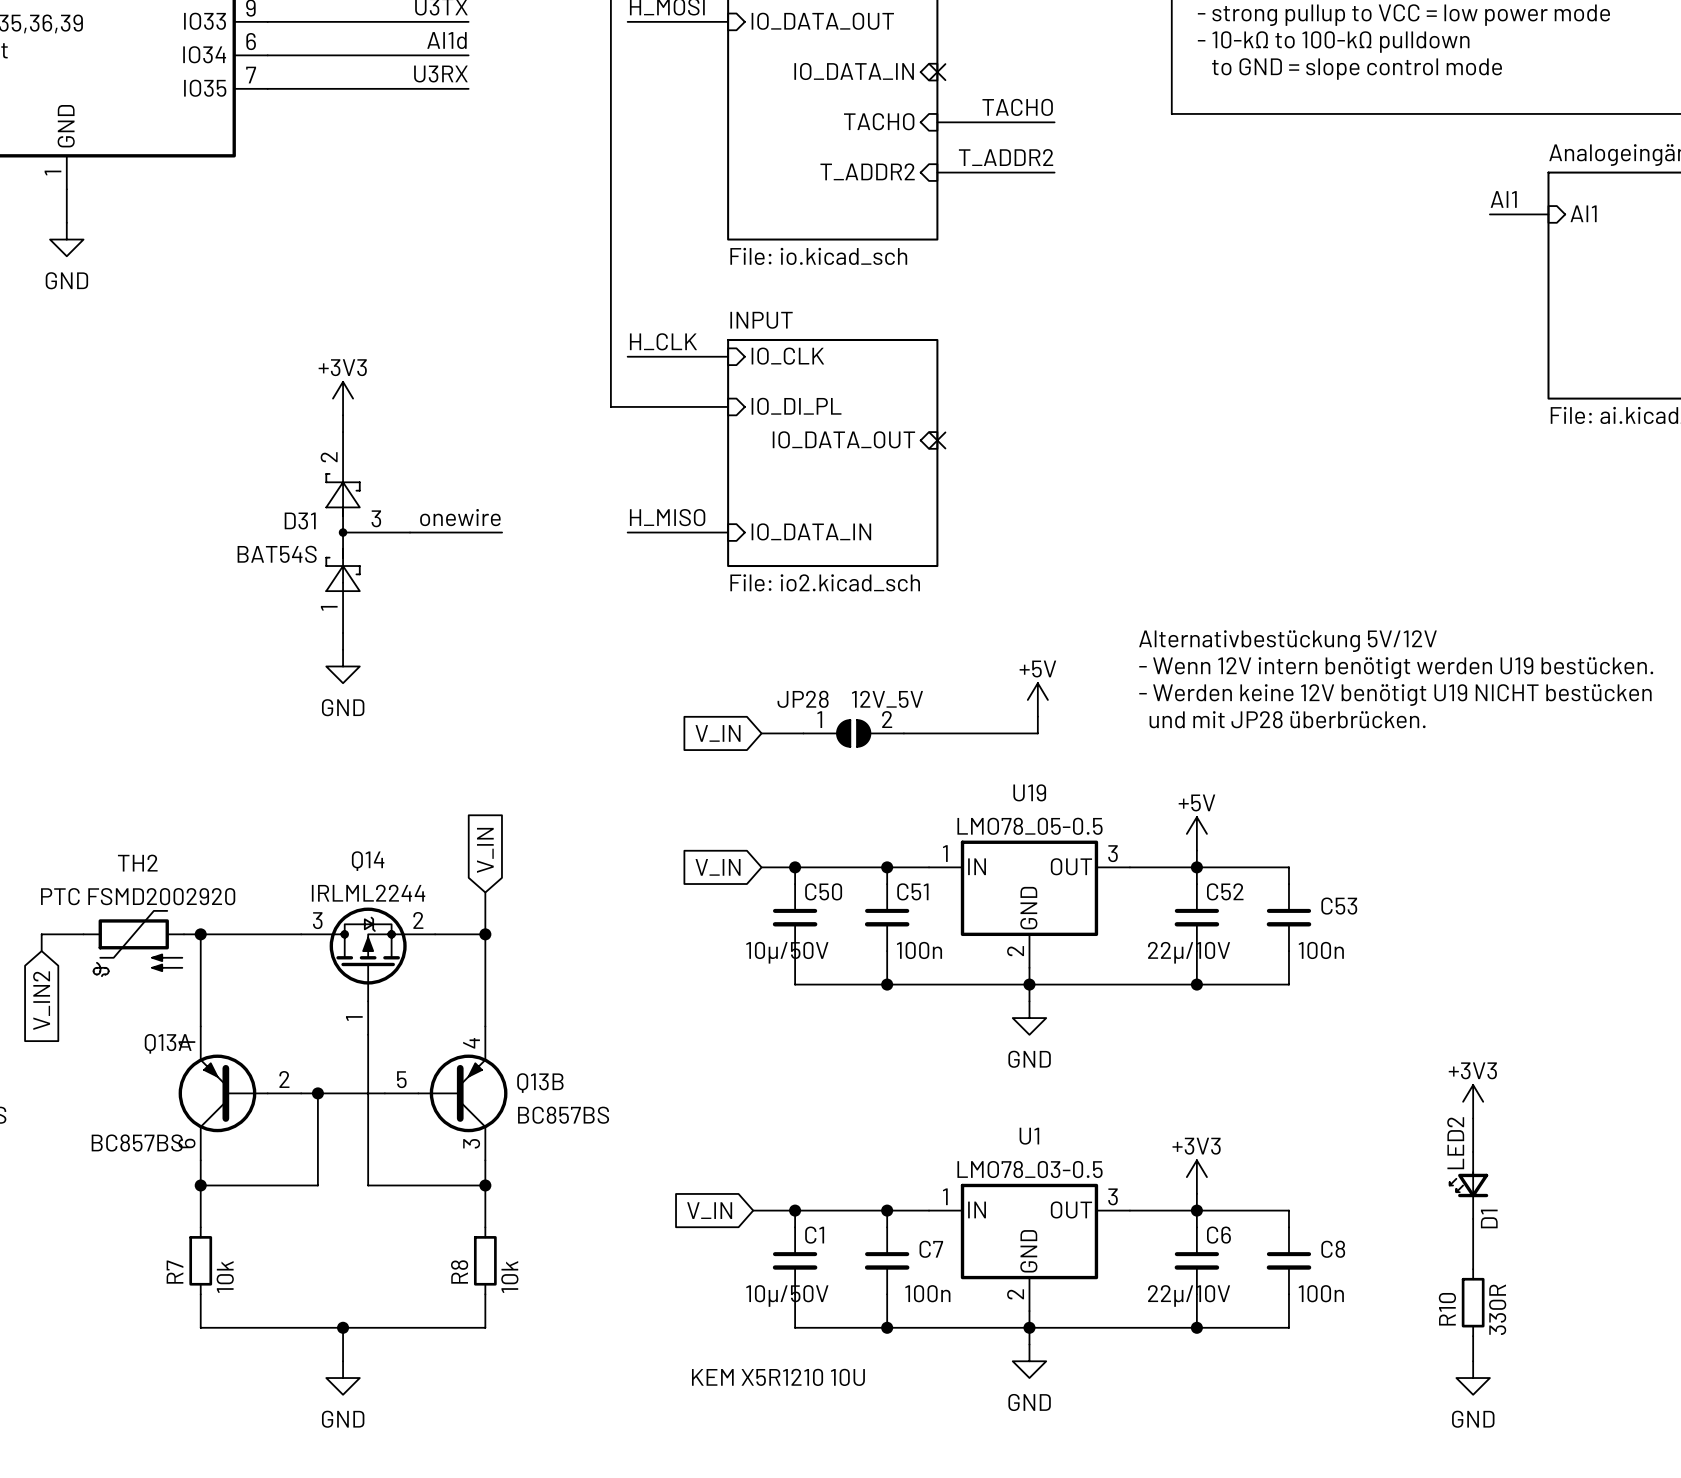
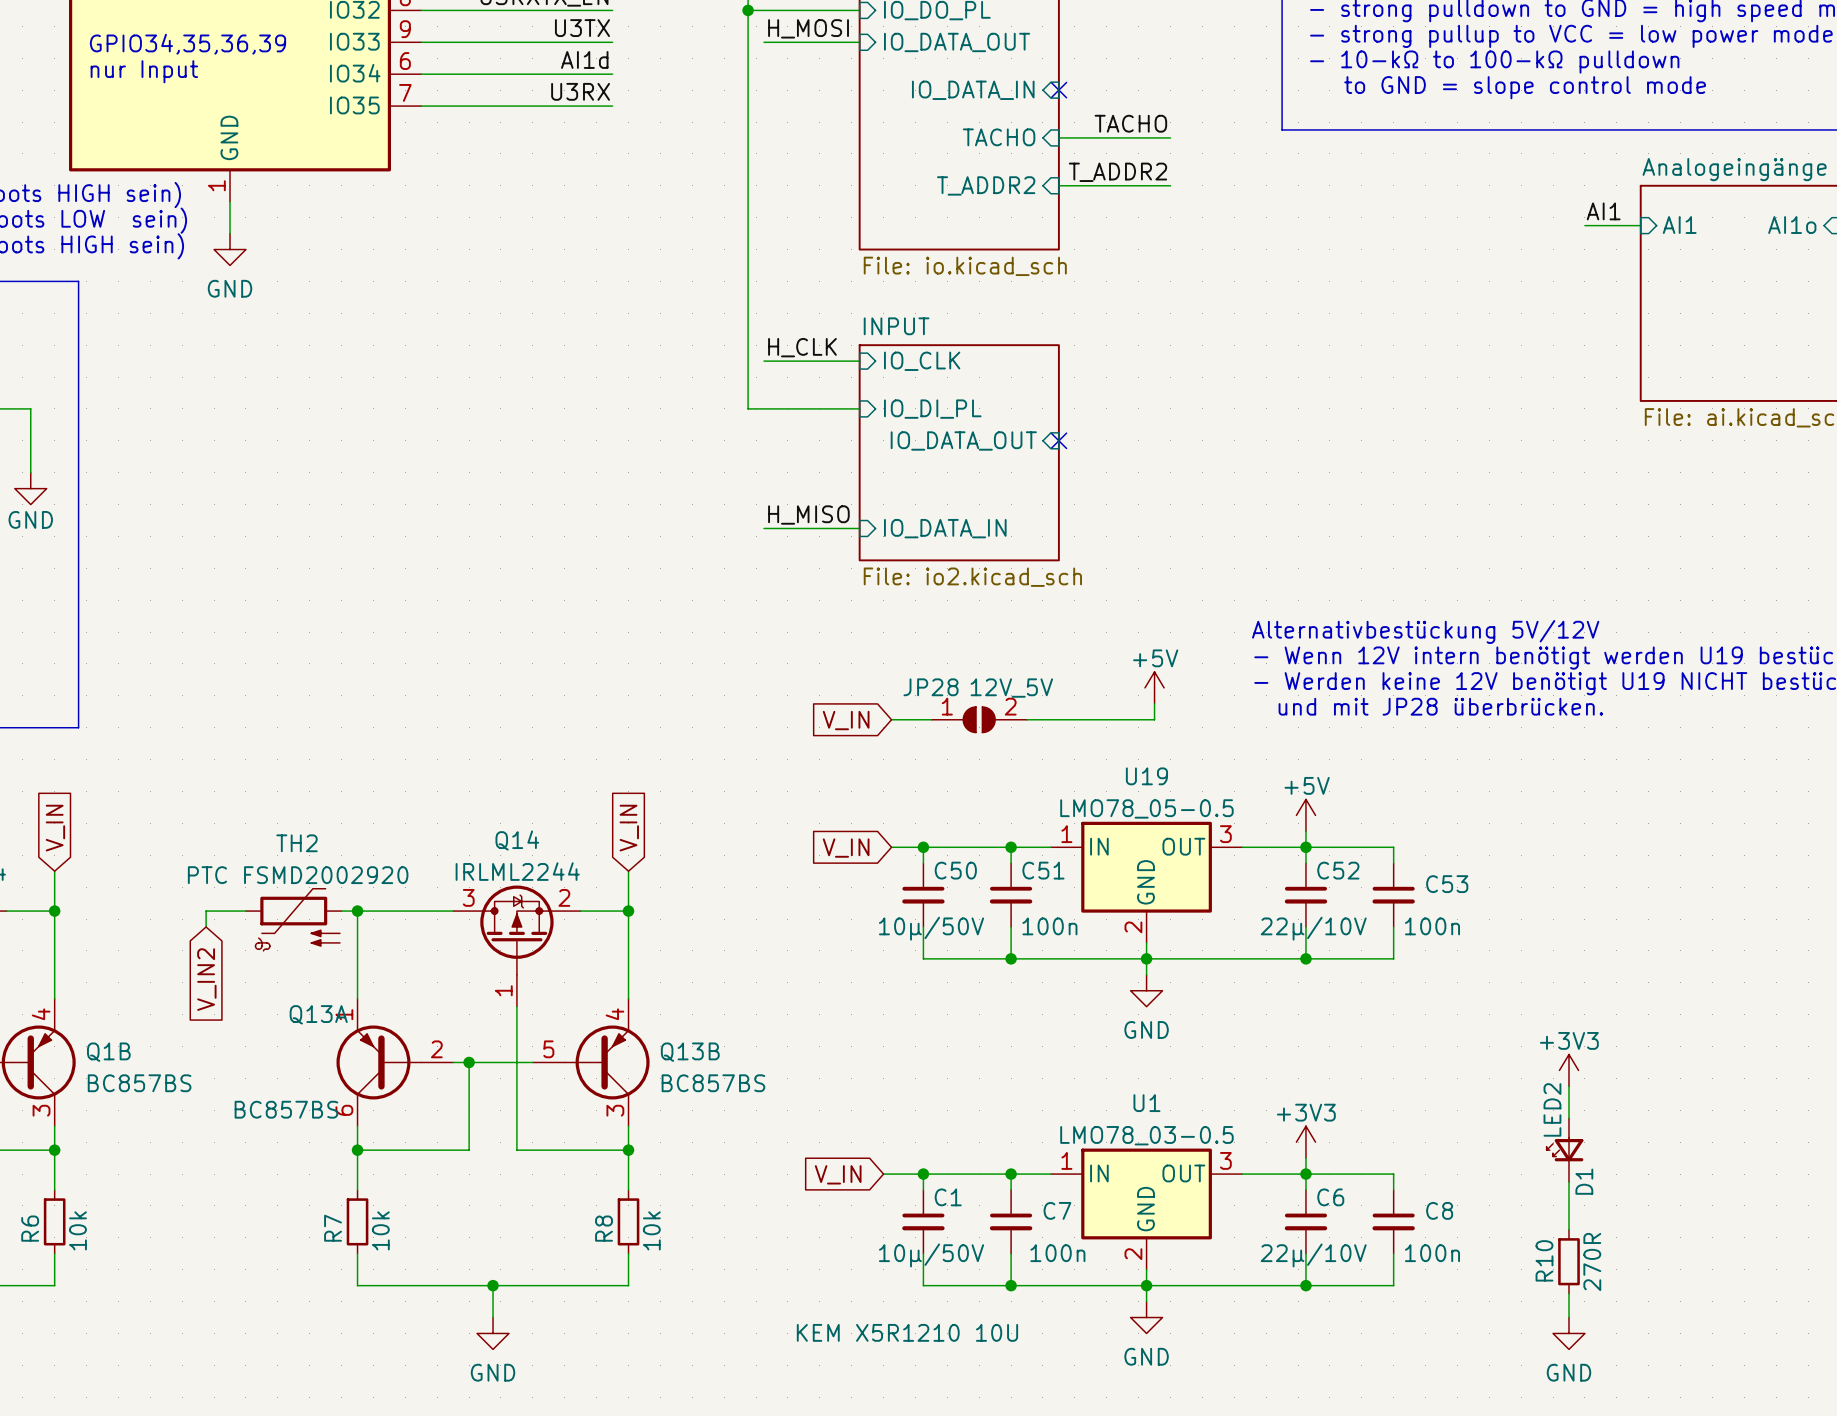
power symbol: +3V3 (343, 398) -> none
wire: (343, 415) (343, 432) -> none
label: onewire (460, 517) -> none
D31: BAT54S (368, 532) -> none
wire: (410, 532) (502, 532) -> none
wire: (343, 632) (343, 649) -> none
power symbol: GND (343, 666) -> none
R10 value: 330R (1497, 1309) -> 270R (1592, 1262)

